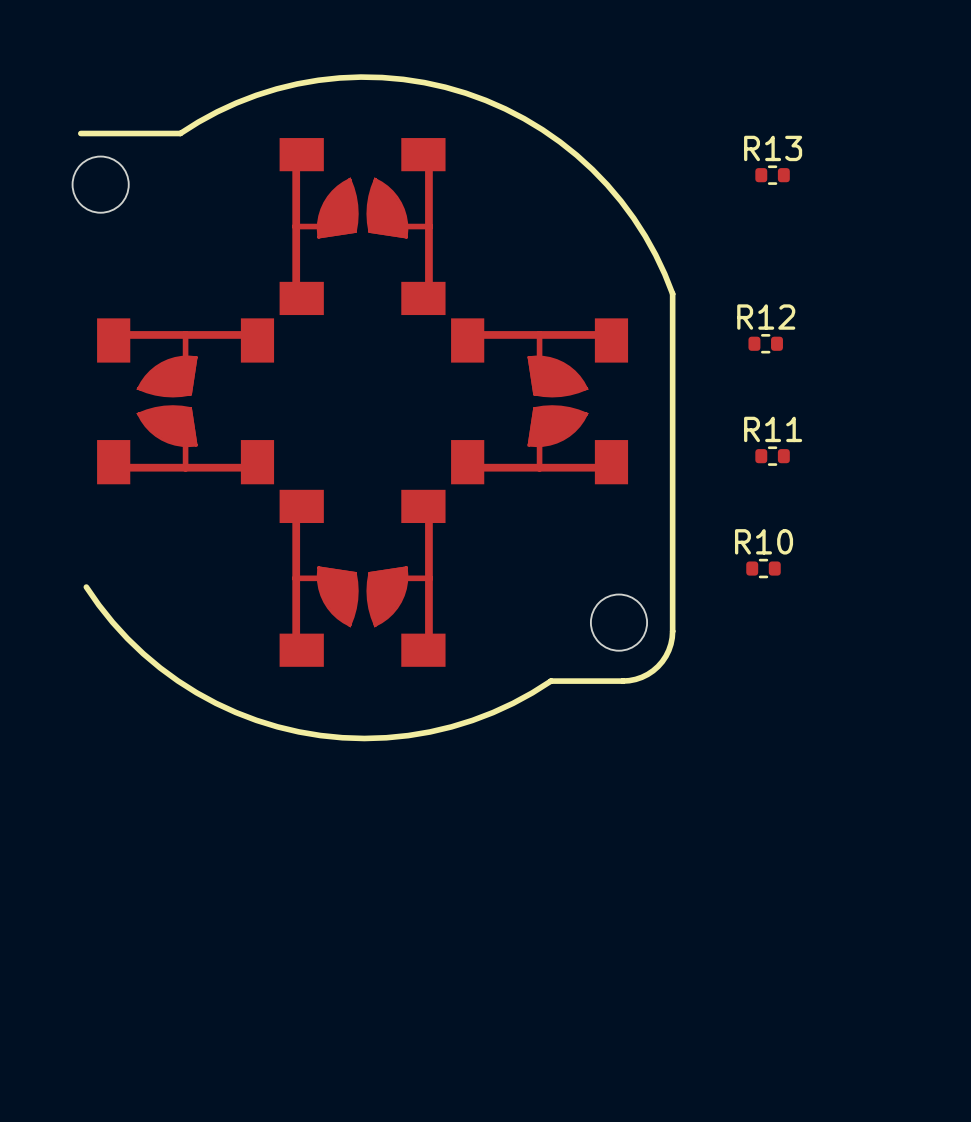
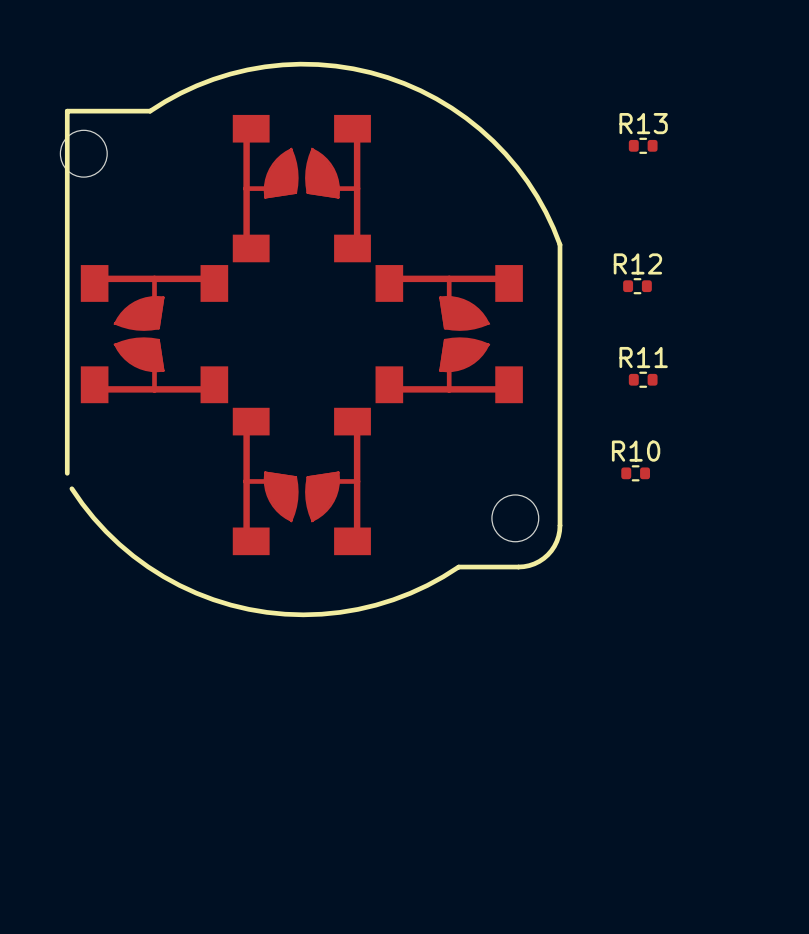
line: none -> (67, 111) (67, 473)

